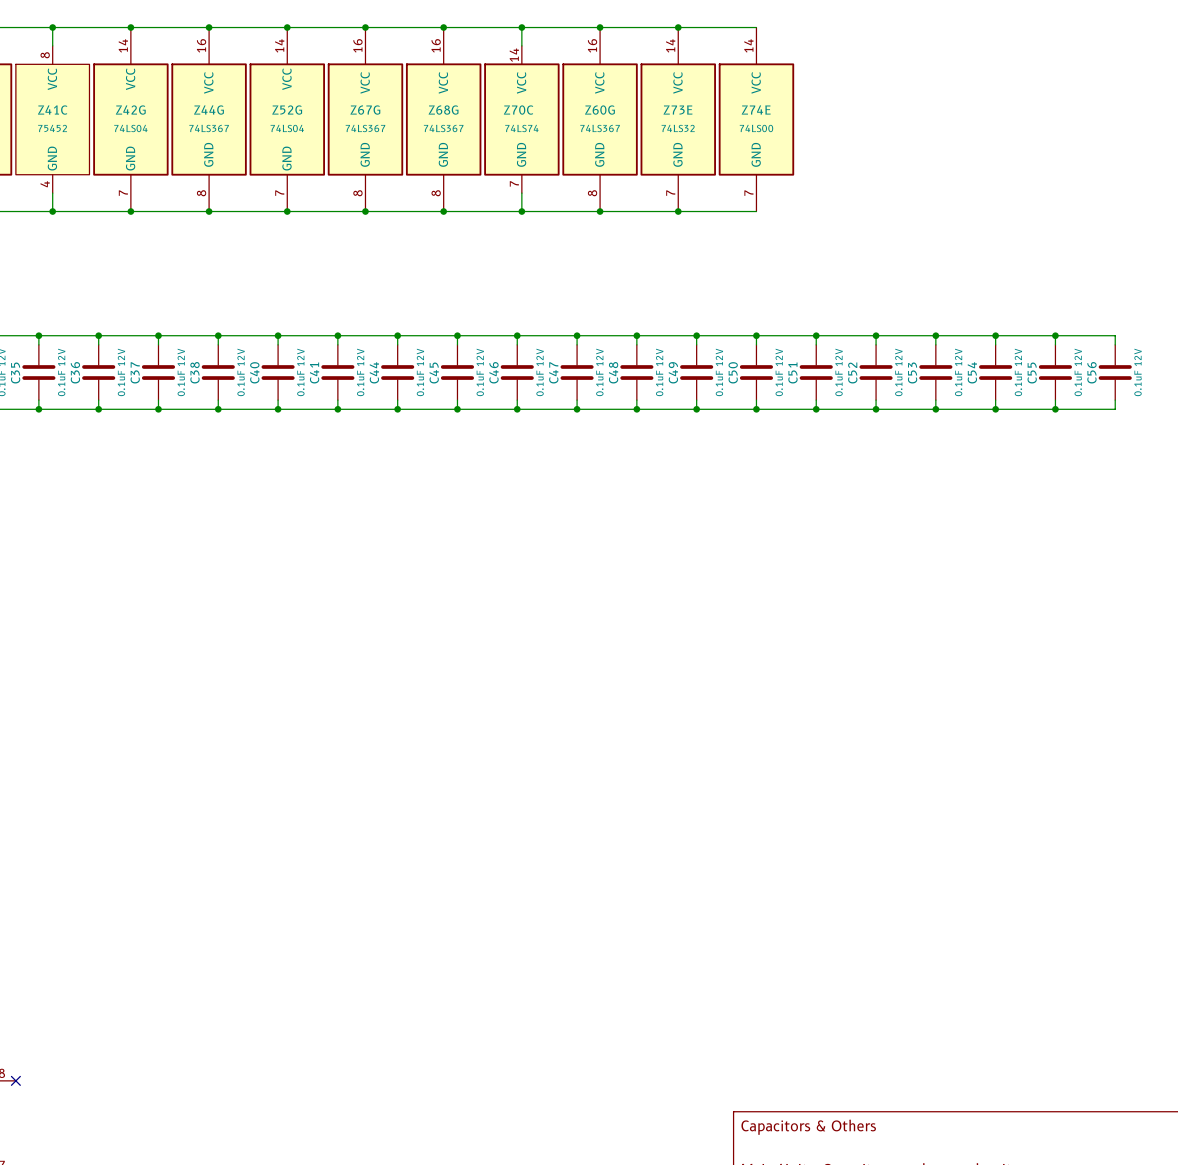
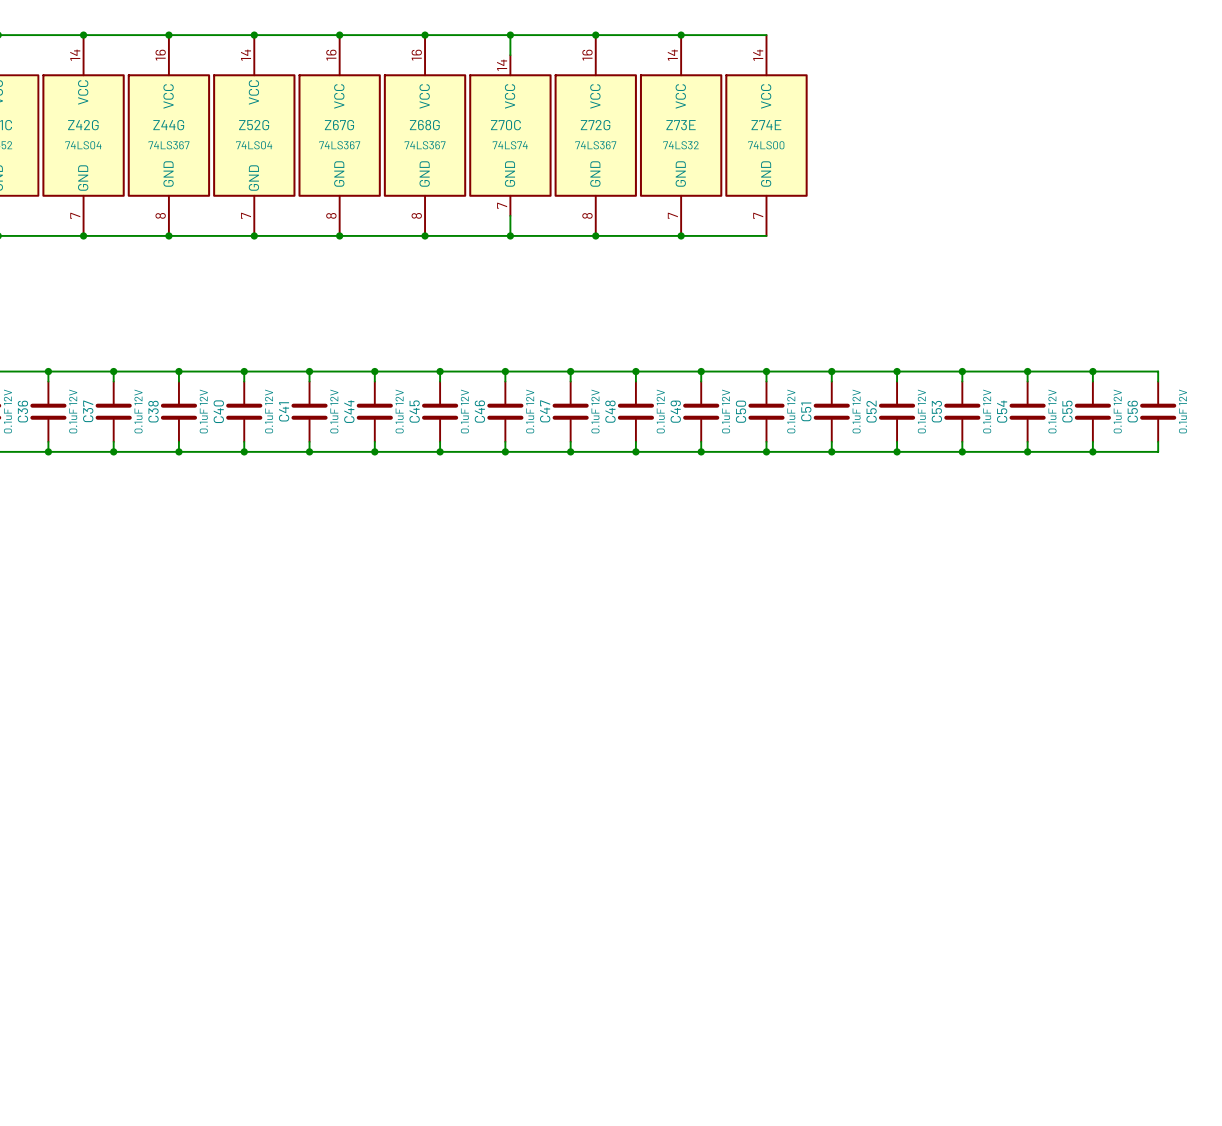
Z60G name: Z60G (599, 110) -> Z72G (595, 125)

